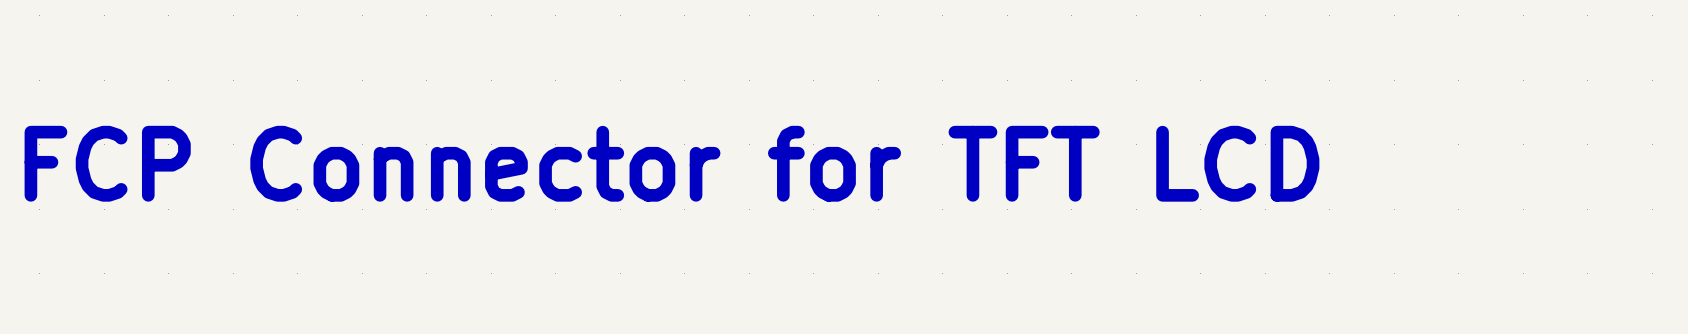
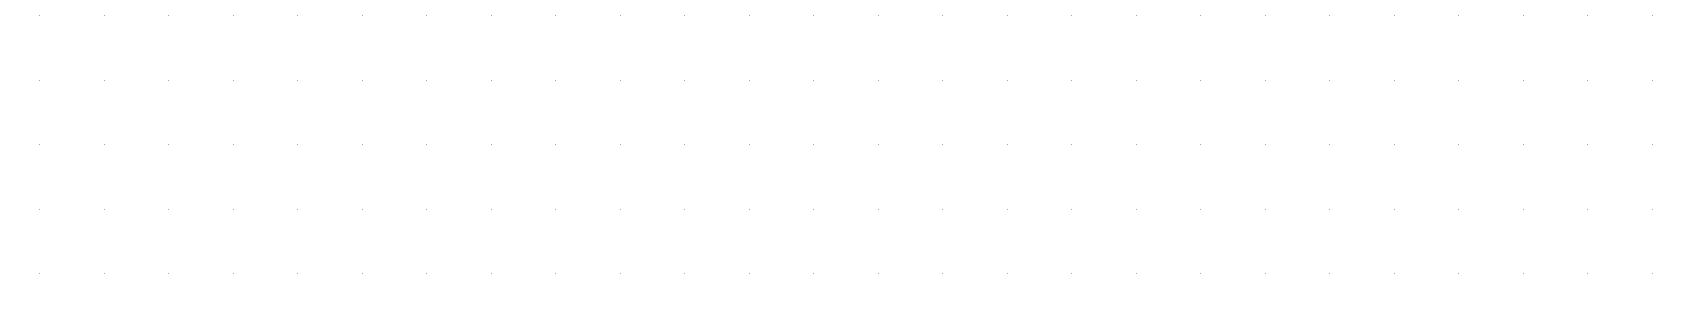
text: FCP Connector for TFT LCD (671, 163) -> none

